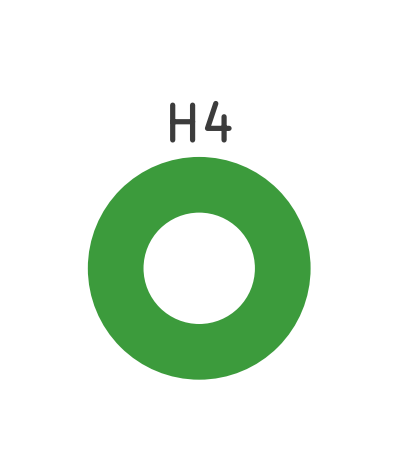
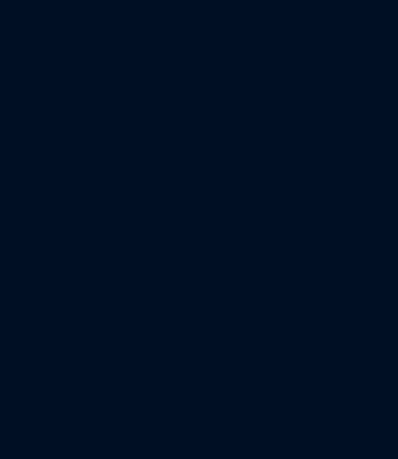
H4: (199, 268) -> none

